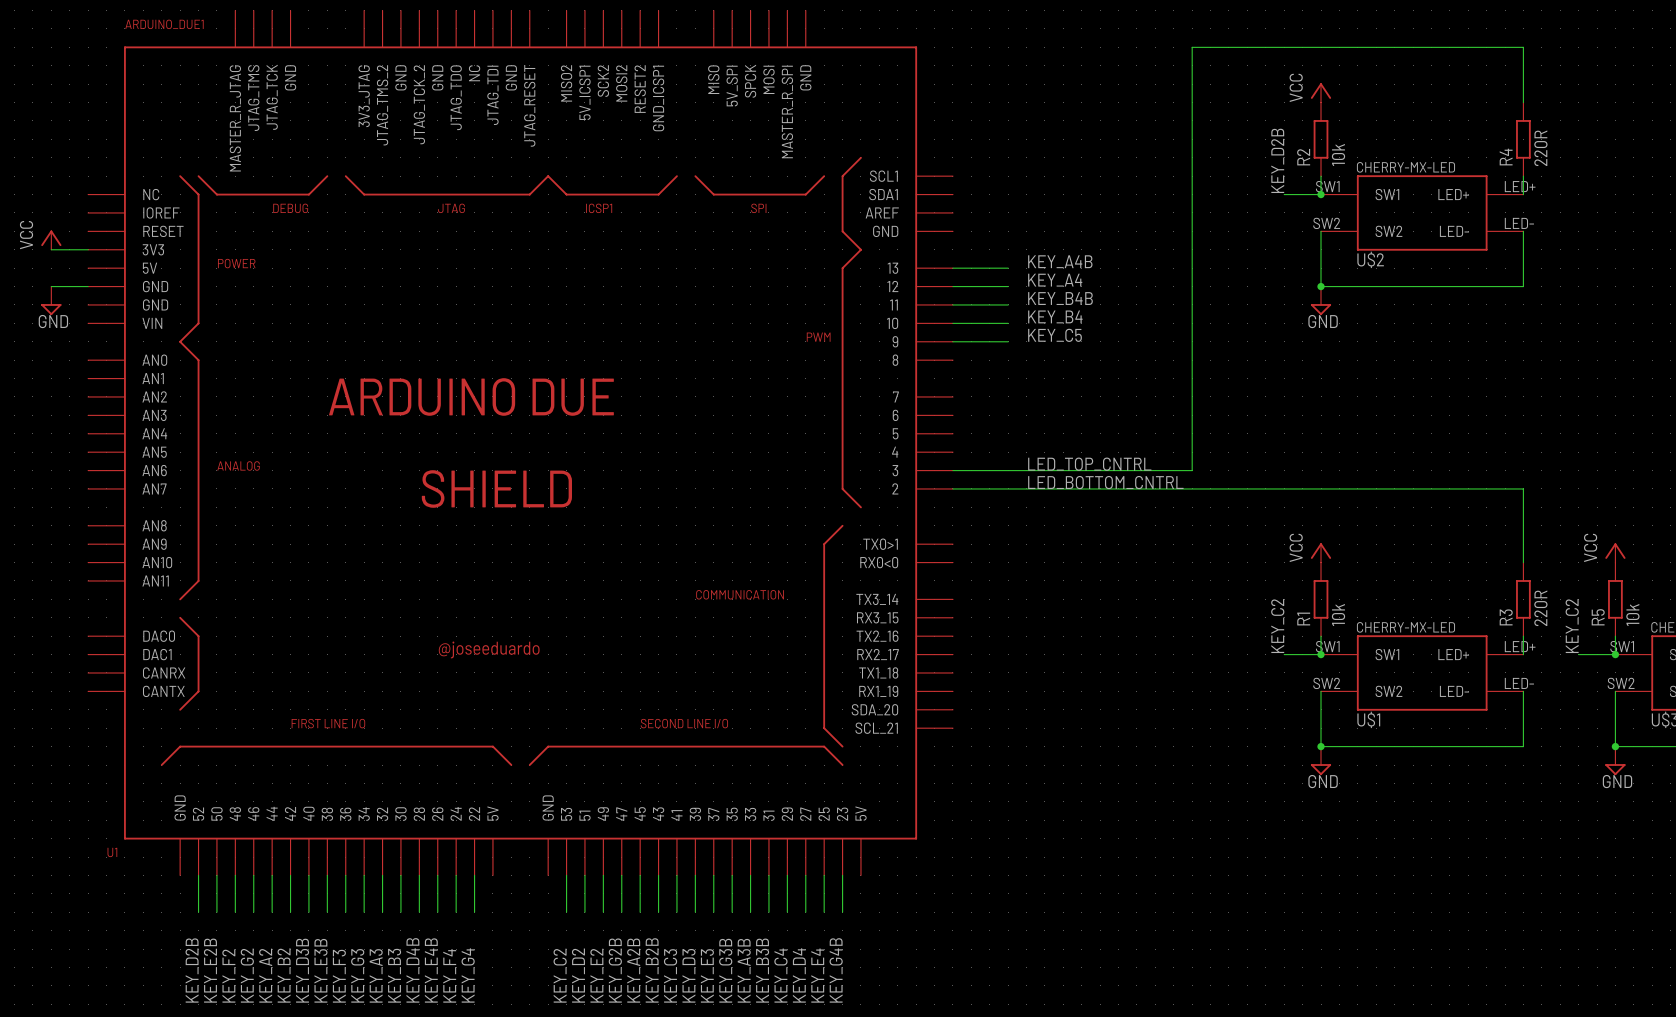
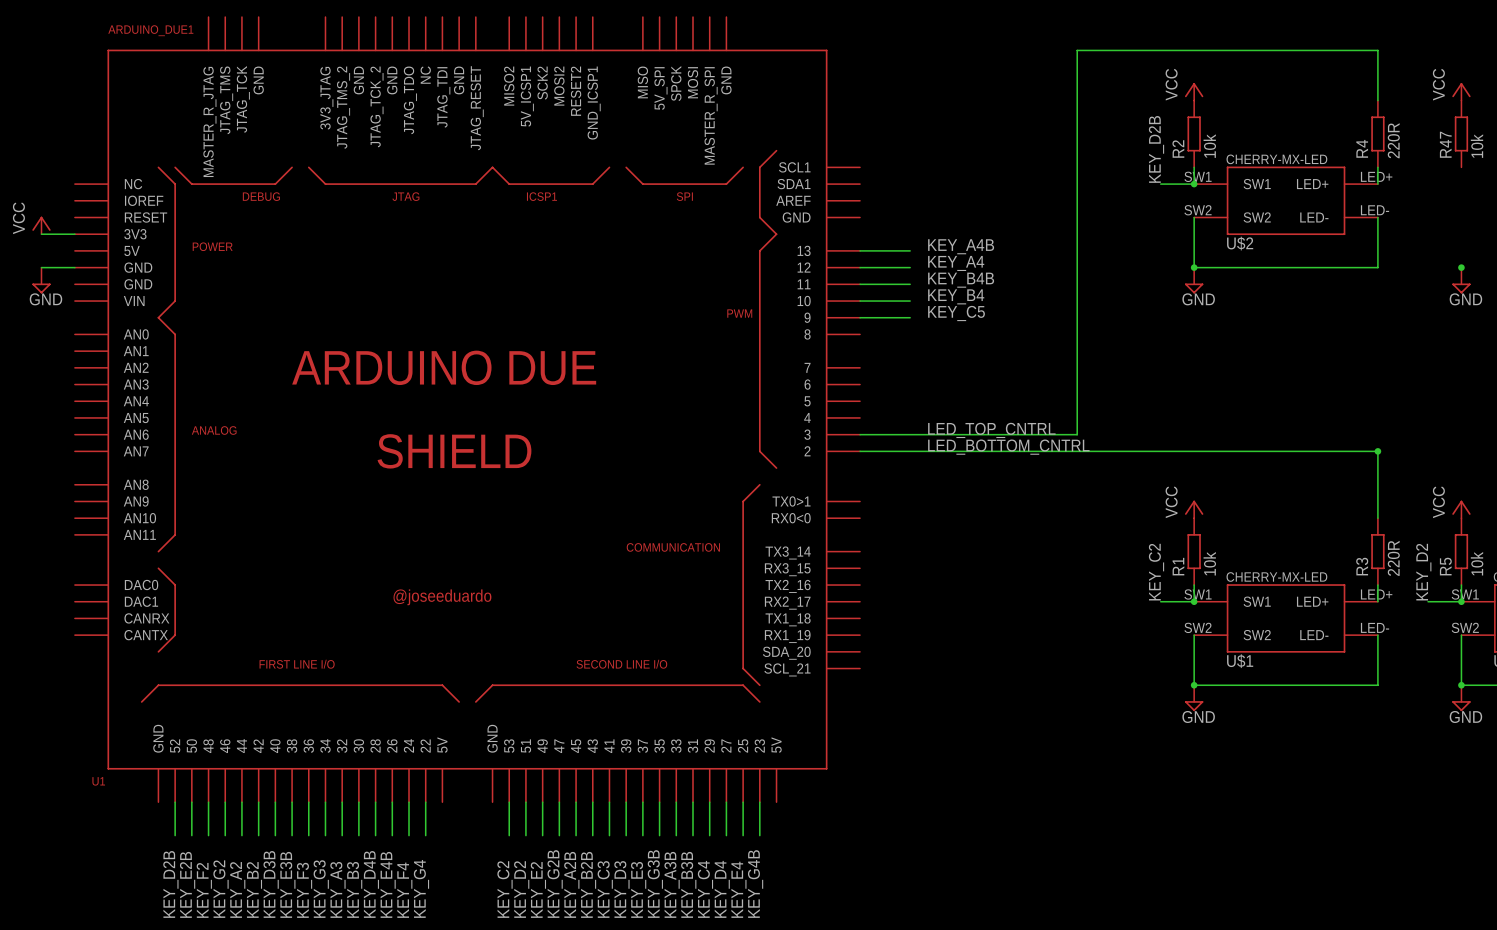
power symbol: none -> VCC (1461, 91)
R47: none -> 10k (1461, 133)
junction: none -> (1461, 267)
power symbol: none -> GND (1461, 280)
junction: none -> (1377, 451)
label: KEY_C2 (1572, 626) -> KEY_D2 (1423, 572)

